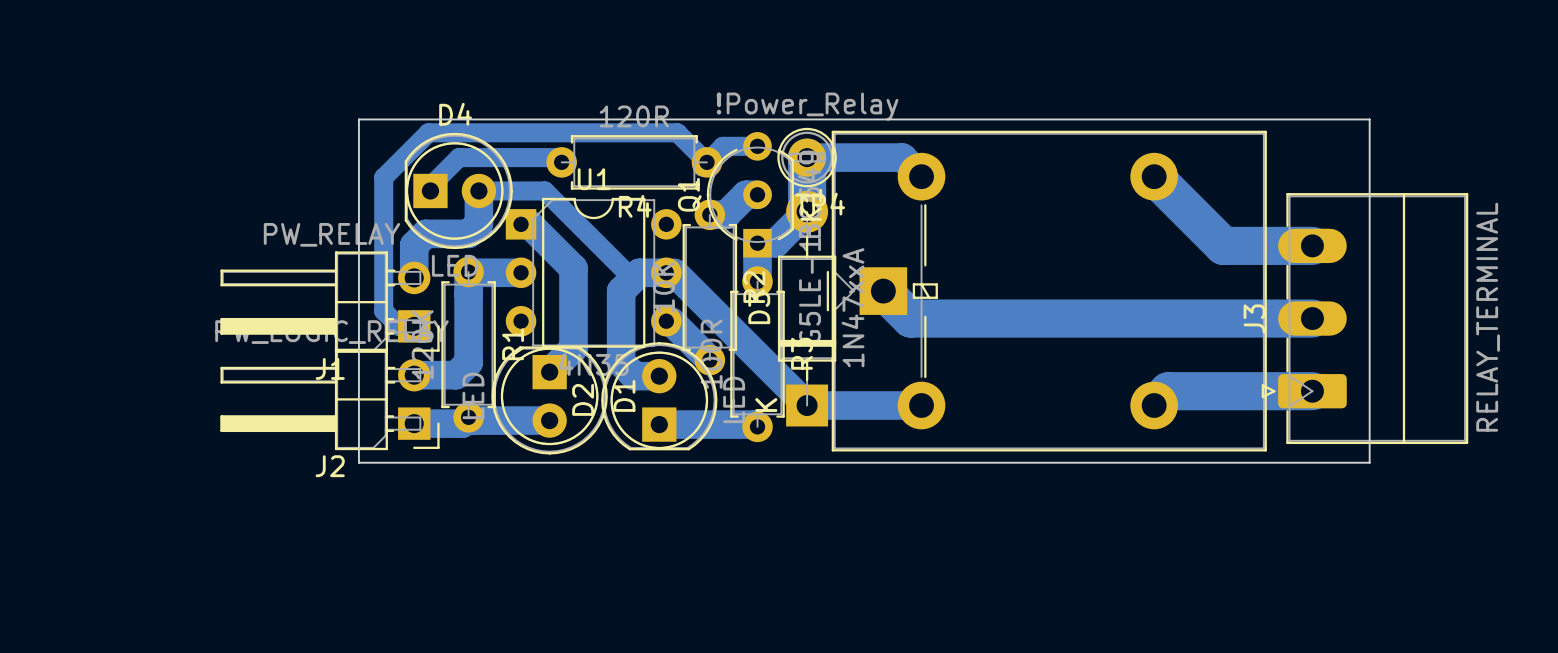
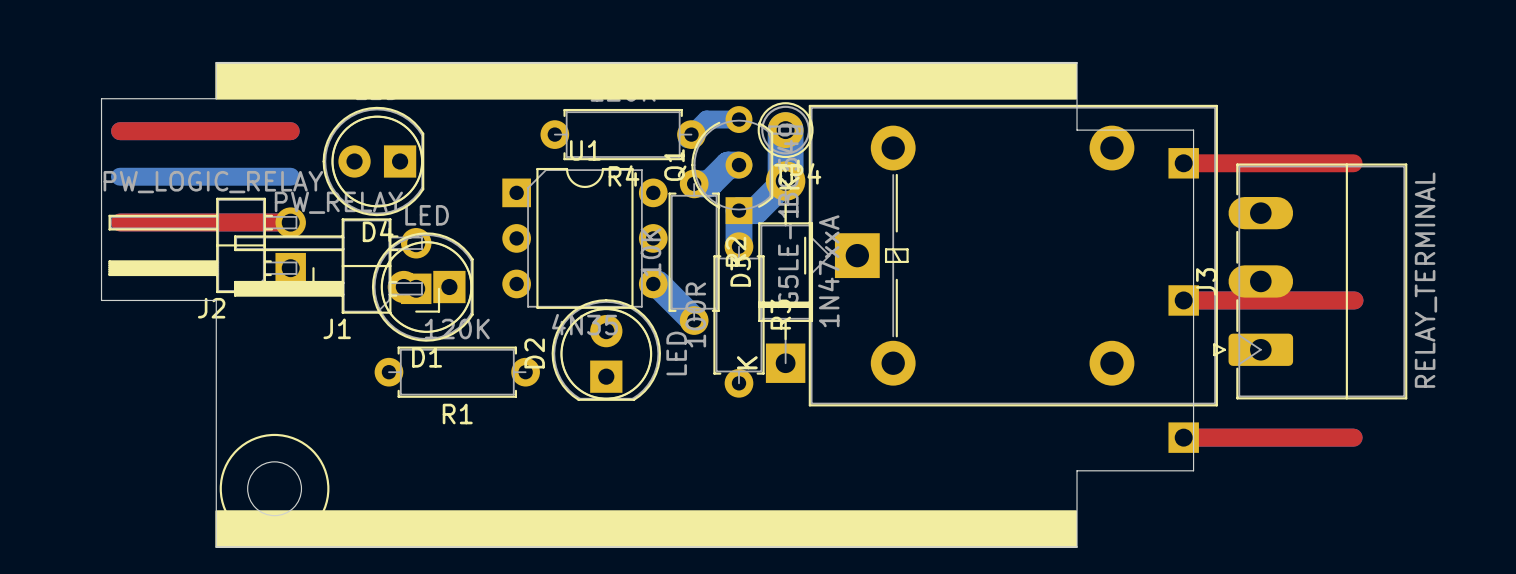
drawing: none -> [215, 61, 1078, 100]
board edge: none -> (216, 62) (216, 98) (101, 98) (101, 300) (216, 300) (216, 547) (1077, 547) (1077, 470) (1193, 470) (1193, 130) (1077, 130) (1077, 62) (216, 62)
board edge: (358, 119) (1369, 119) (1369, 462) (358, 462) (358, 119) -> none
bottom track: (807, 157) (902, 157) (921, 176) -> none
top track: none -> (120, 131) (290, 131)
bottom track: (561, 162) (556, 157) (459, 157) (430, 186) (430, 190) -> none
bottom track: (706, 162) (677, 132) (428, 132) (383, 177) (383, 311) (398, 326) (414, 326) -> none
bottom track: (1154, 176) (1223, 245) (1312, 245) -> none
D4 rotation: 0° (458, 190) -> 180° (373, 161)
D4 position: (458, 190) -> (373, 161)
top track: none -> (1183, 163) (1353, 163)
part: none -> (1183, 163)
bottom track: none -> (119, 176) (290, 176)
bottom track: (521, 224) (529, 224) (573, 268) (573, 348) (549, 372) -> none
top track: none -> (120, 222) (290, 222)
bottom track: (521, 272) (468, 272) (468, 362) (456, 375) (414, 375) -> none
bottom track: (656, 272) (626, 272) (544, 190) (478, 190) (478, 223) (468, 233) (425, 233) (414, 245) (414, 277) -> none
bottom track: (666, 272) (639, 272) (621, 291) (621, 362) (634, 376) (659, 376) -> none
bottom track: (674, 272) (807, 405) (921, 405) -> none
bottom track: (883, 291) (910, 318) (1312, 318) -> none
top track: none -> (1183, 300) (1354, 300)
part: none -> (1183, 300)
R1 rotation: 0° (468, 344) -> 90° clockwise (457, 372)
bottom track: (1312, 391) (1168, 391) (1154, 405) -> none
D2 position: (659, 396) -> (606, 350)
J2 position: (330, 399) -> (211, 245)
D1 rotation: 0° (549, 400) -> 90° clockwise (422, 287)
D1 position: (549, 400) -> (422, 287)
bottom track: (549, 420) (471, 420) (468, 417) (462, 423) (414, 423) -> none
bottom track: (659, 424) (755, 424) (757, 426) -> none
drawing: none -> [215, 433, 1078, 548]
top track: none -> (1183, 437) (1353, 437)
part: none -> (1183, 437)
round board edge: none -> [247, 461, 302, 517]

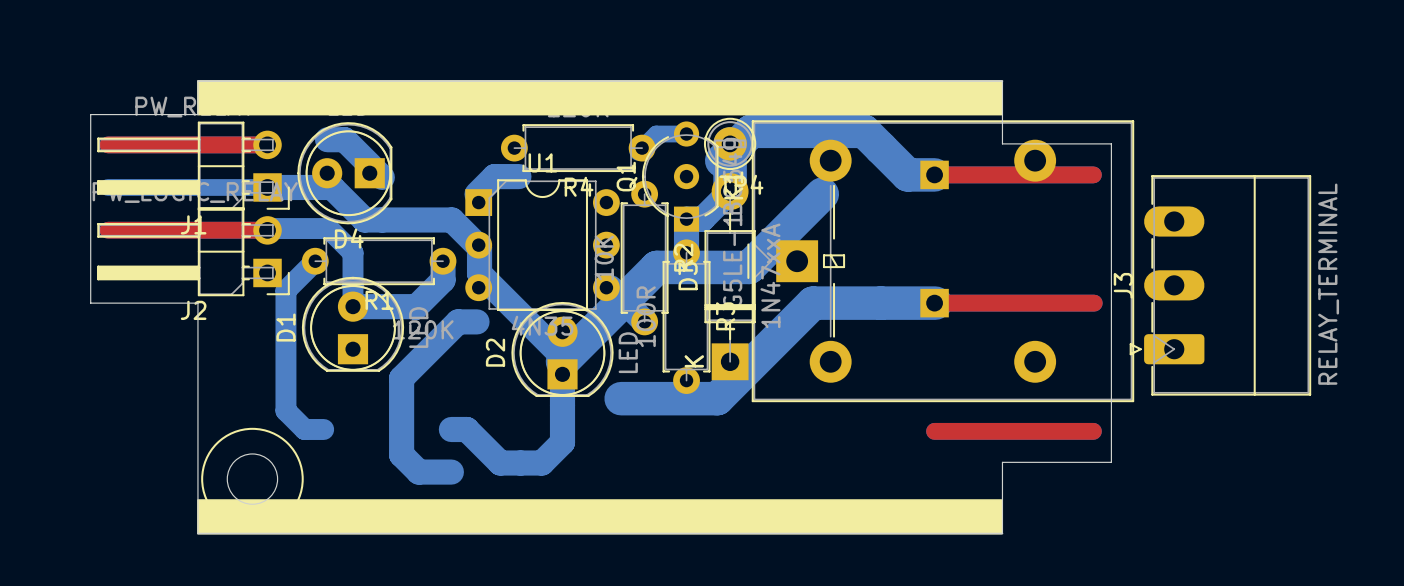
bottom track: none -> (327, 139) (344, 139) (382, 177)
bottom track: none -> (721, 160) (751, 131) (864, 131) (907, 174) (1093, 174)
part: none -> (934, 174)
top track: (1183, 163) (1353, 163) -> (934, 174) (1093, 174)
part: (1183, 163) -> none
bottom track: none -> (518, 176) (494, 176) (477, 194)
bottom track: (738, 165) (728, 165) (709, 183) (694, 183) -> none
bottom track: none -> (267, 187) (332, 187) (364, 219) (451, 219) (479, 247) (479, 273) (562, 356) (562, 442) (541, 463) (500, 463) (466, 429) (451, 429)
bottom track: none -> (822, 194) (749, 267) (656, 267) (562, 361)
bottom track: none -> (267, 230) (269, 228) (328, 228) (353, 252) (353, 306) (415, 307) (443, 280) (443, 261)
bottom track: none -> (315, 261) (285, 290) (285, 410) (304, 429) (323, 429)
J1 position: (337, 266) -> (193, 166)
D1 rotation: 0° (422, 287) -> 90° clockwise (353, 324)
part: none -> (934, 303)
bottom track: none -> (935, 303) (812, 303) (717, 398) (621, 398)
top track: (1183, 300) (1354, 300) -> (934, 303) (1094, 303)
part: (1183, 300) -> none
bottom track: none -> (477, 321) (458, 321) (401, 378) (401, 454) (418, 472) (451, 472)
R1 position: (457, 372) -> (379, 261)
top track: (1183, 437) (1353, 437) -> (934, 431) (1093, 431)
part: (1183, 437) -> none

